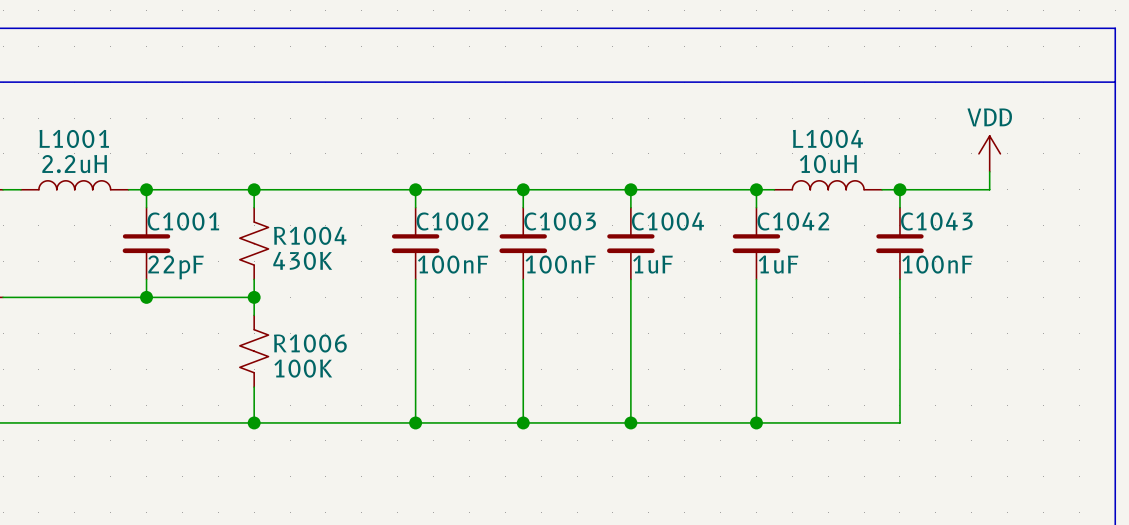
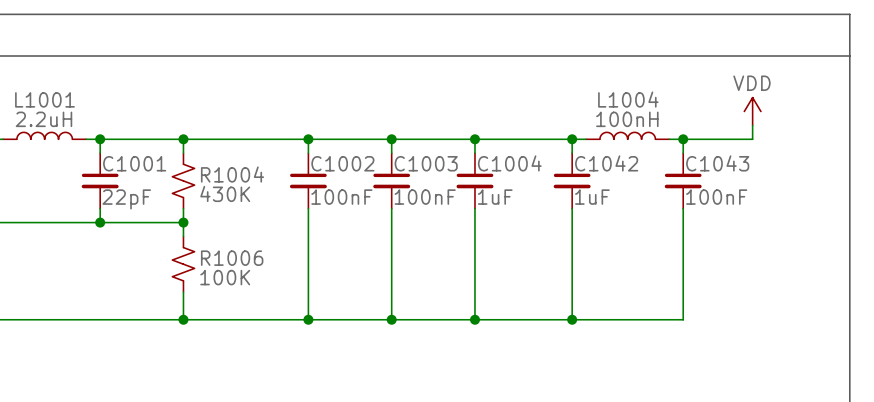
L1004 value: 10uH (828, 164) -> 100nH (627, 119)

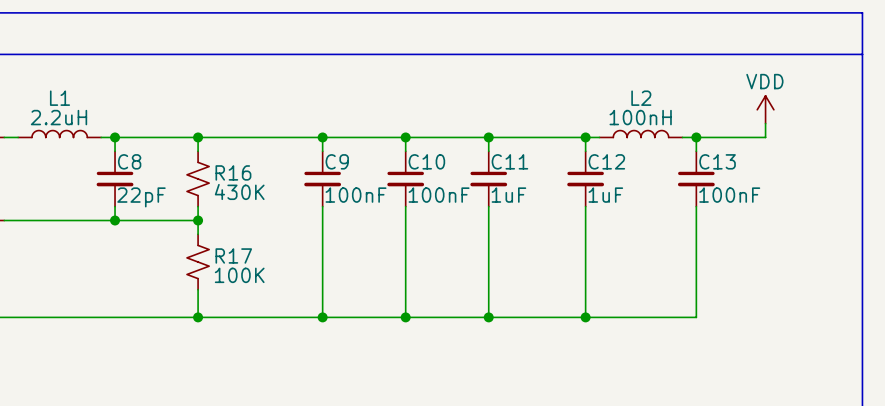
L1001 name: L1001 (44, 99) -> L1 (59, 98)
L1004 name: L1004 (628, 99) -> L2 (641, 98)
C1001 name: C1001 (134, 163) -> C8 (129, 161)
C1002 name: C1002 (342, 163) -> C9 (337, 161)
C1003 name: C1003 (426, 163) -> C10 (426, 161)
C1004 name: C1004 (509, 163) -> C11 (509, 161)
C1042 name: C1042 (606, 163) -> C12 (606, 161)
C1043 name: C1043 (717, 163) -> C13 (717, 161)
R1004 name: R1004 (232, 174) -> R16 (233, 172)
R1006 name: R1006 (232, 258) -> R17 (233, 255)

